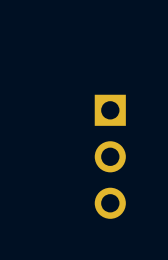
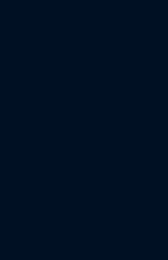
part: (110, 156) -> none

